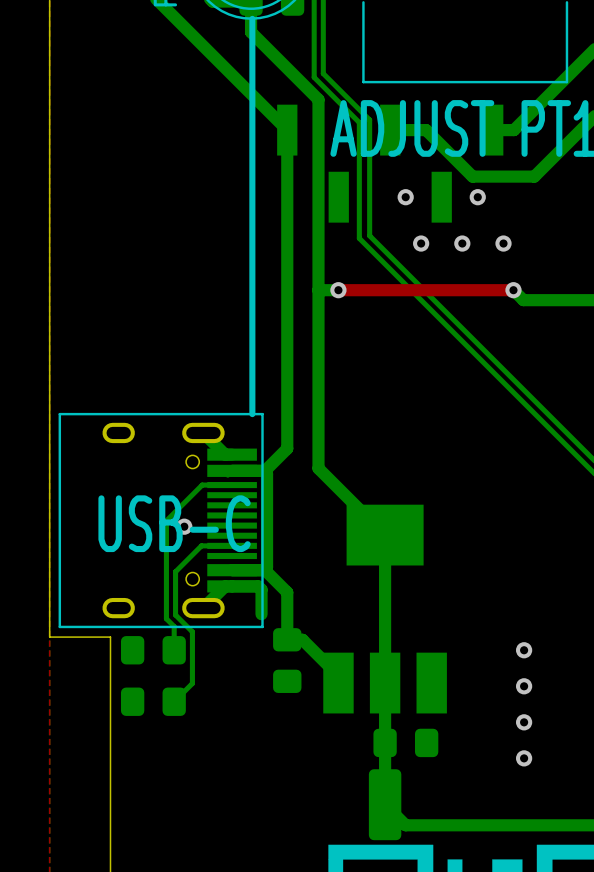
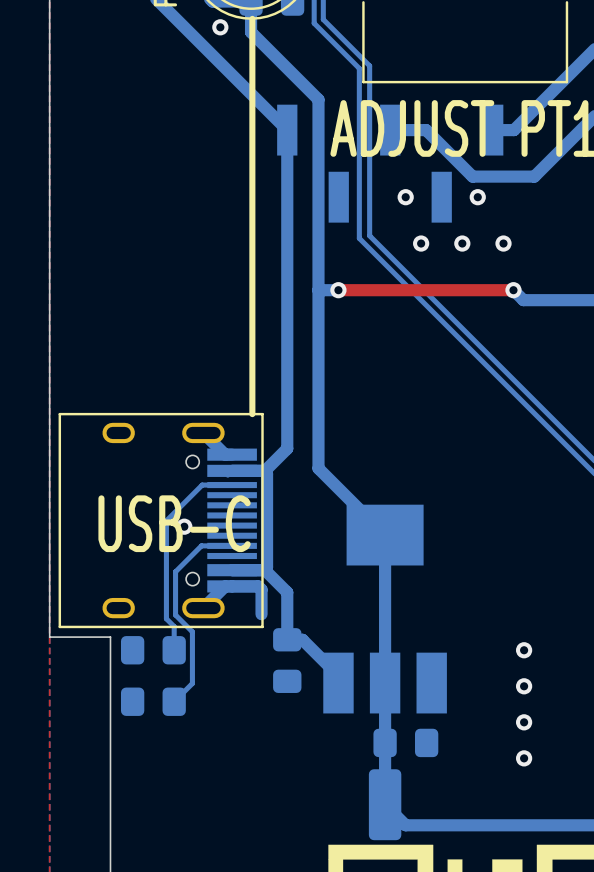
bottom track: (323, 19) (323, 73) (369, 119) -> (323, 19) (369, 65) (369, 119)
bottom track: (314, 23) (314, 77) (359, 122) -> (314, 23) (359, 68) (359, 122)
via: none -> (220, 27)

